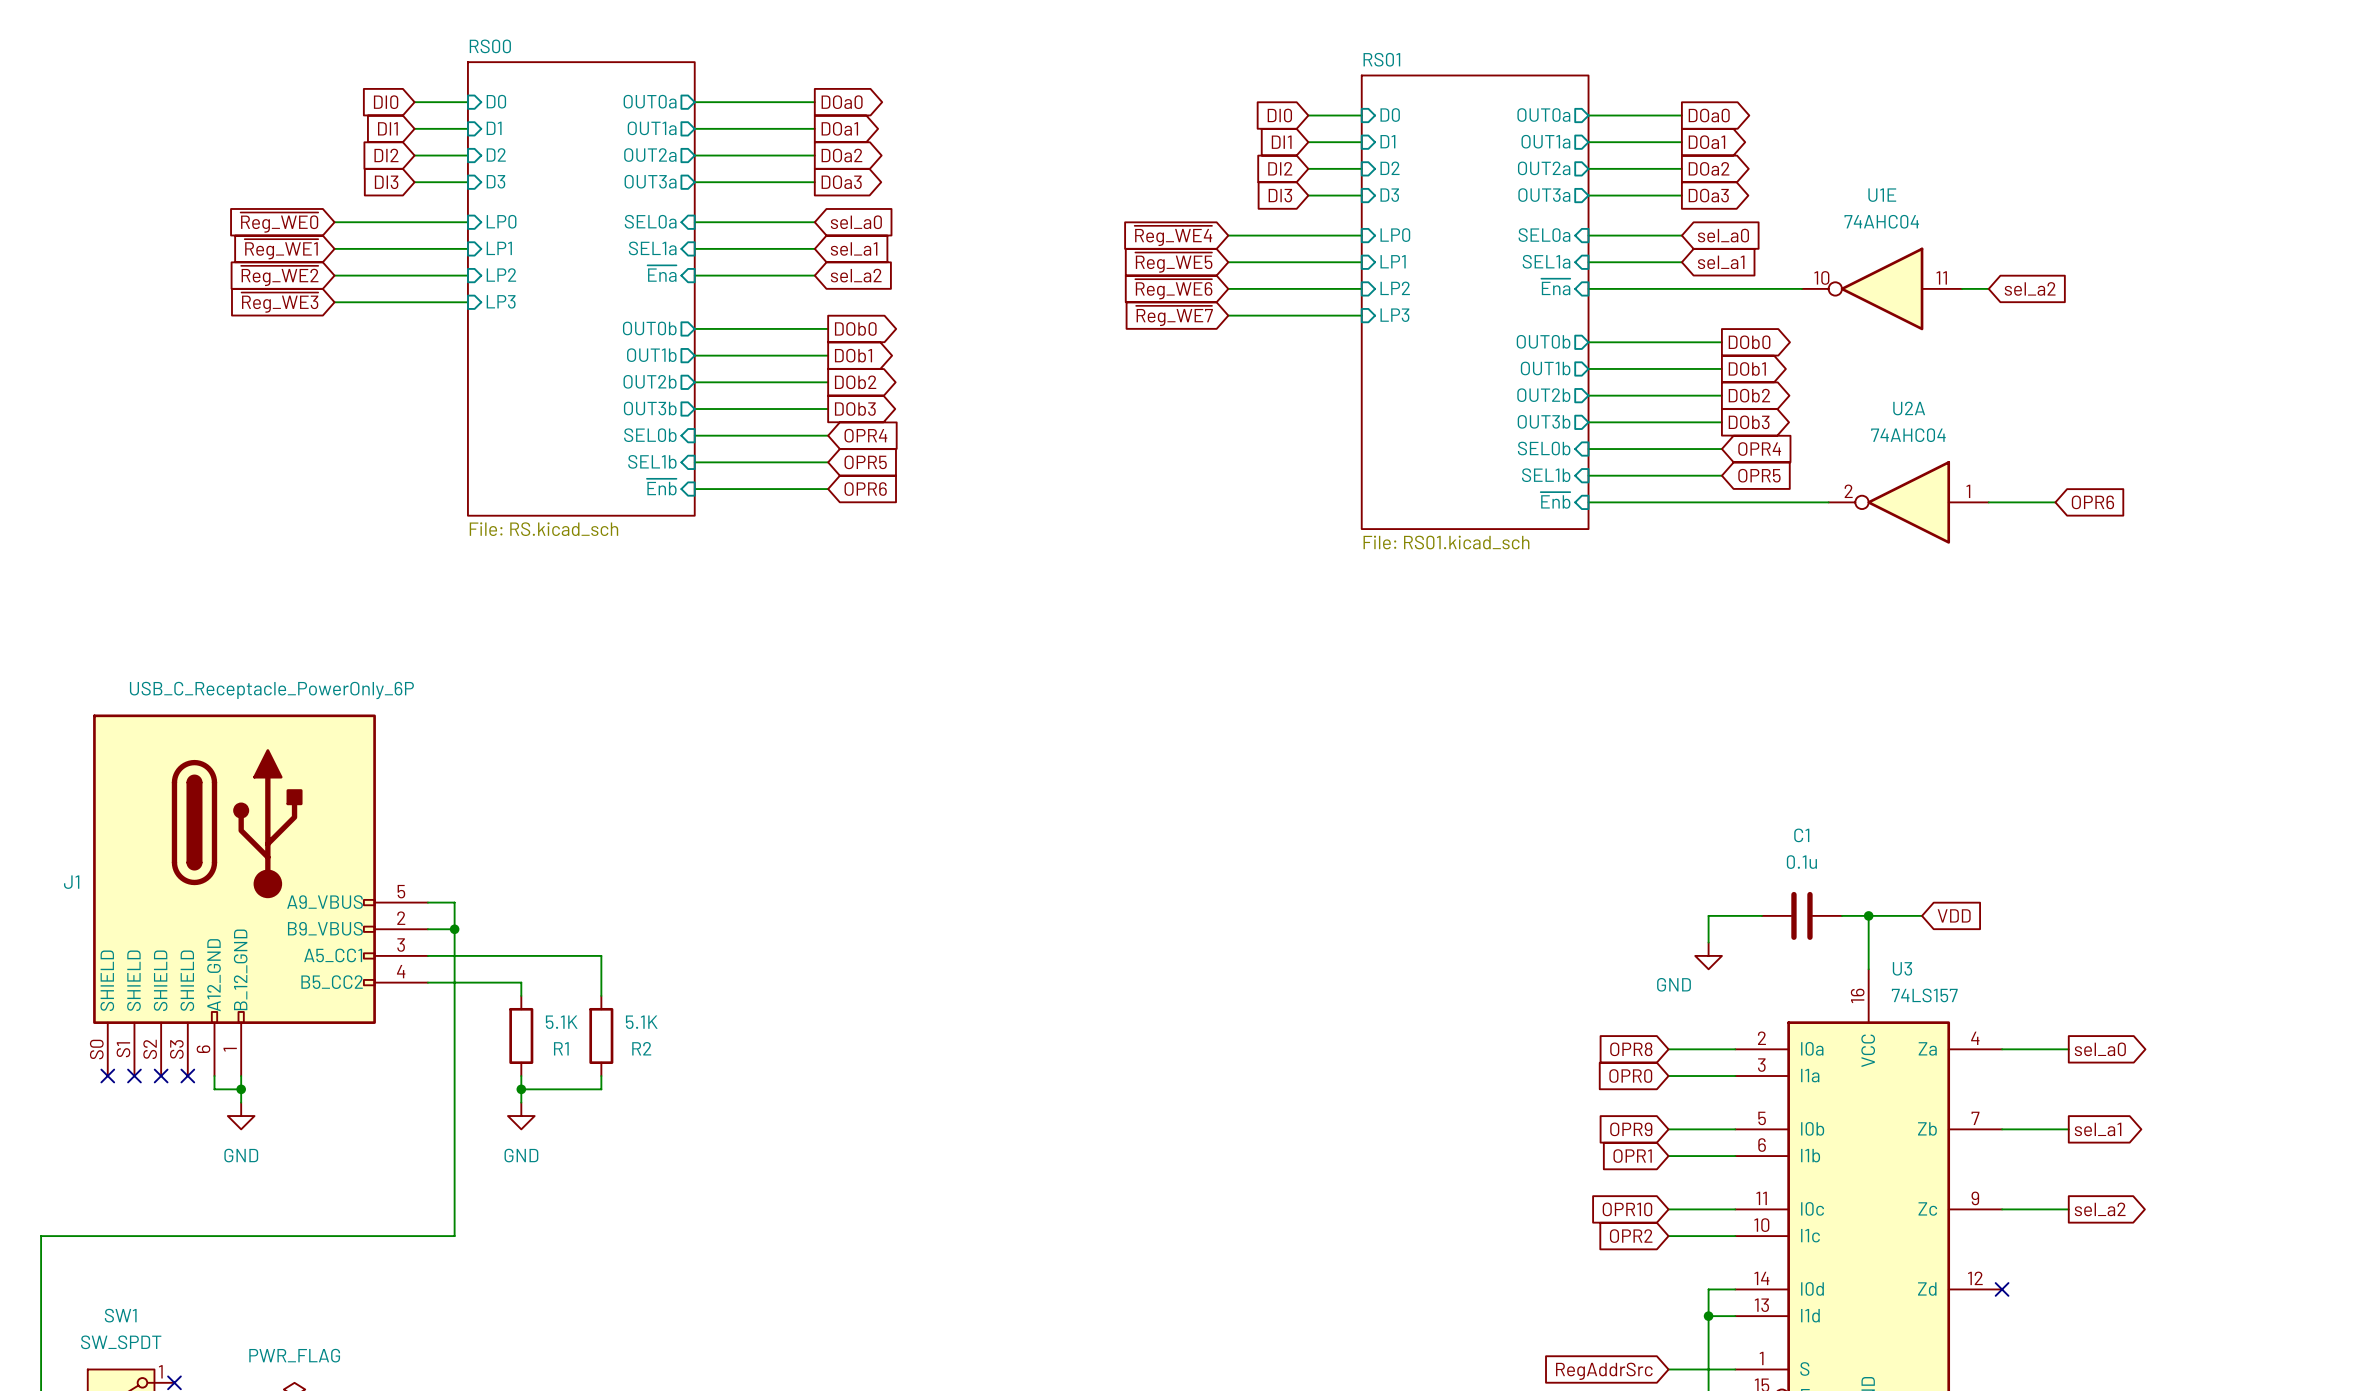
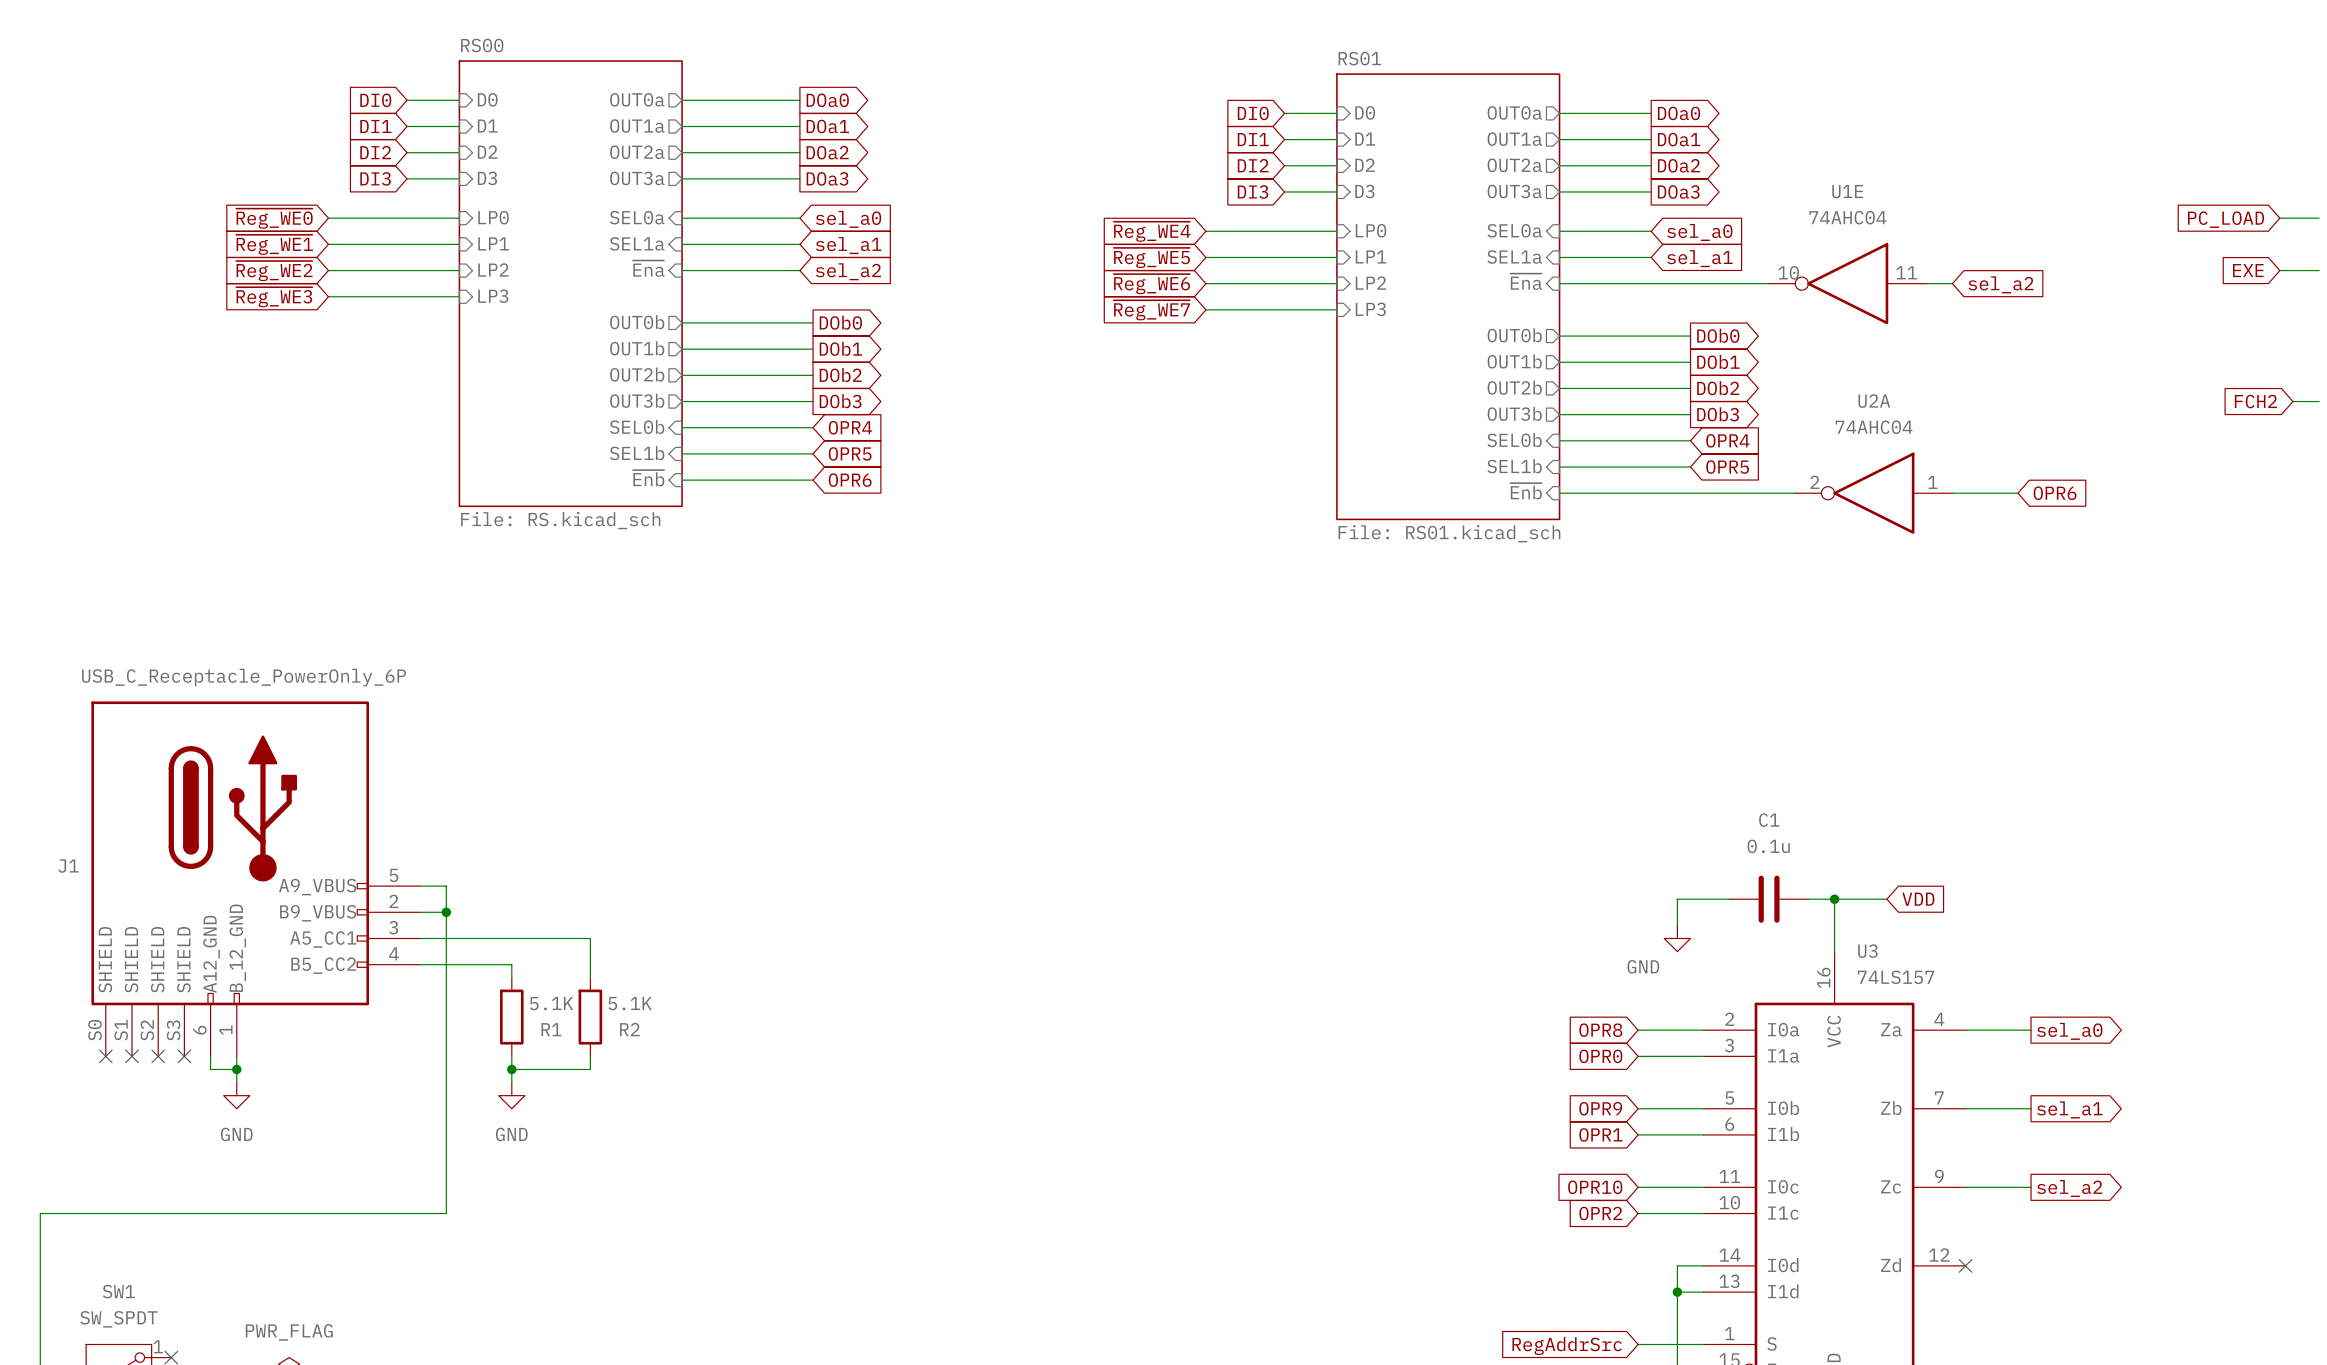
global label: none -> PC_LOAD (2226, 219)
wire: none -> (2279, 218) (2319, 218)
global label: none -> EXE (2248, 270)
wire: none -> (2279, 270) (2319, 270)
global label: none -> FCH2 (2255, 401)
wire: none -> (2292, 401) (2319, 401)

